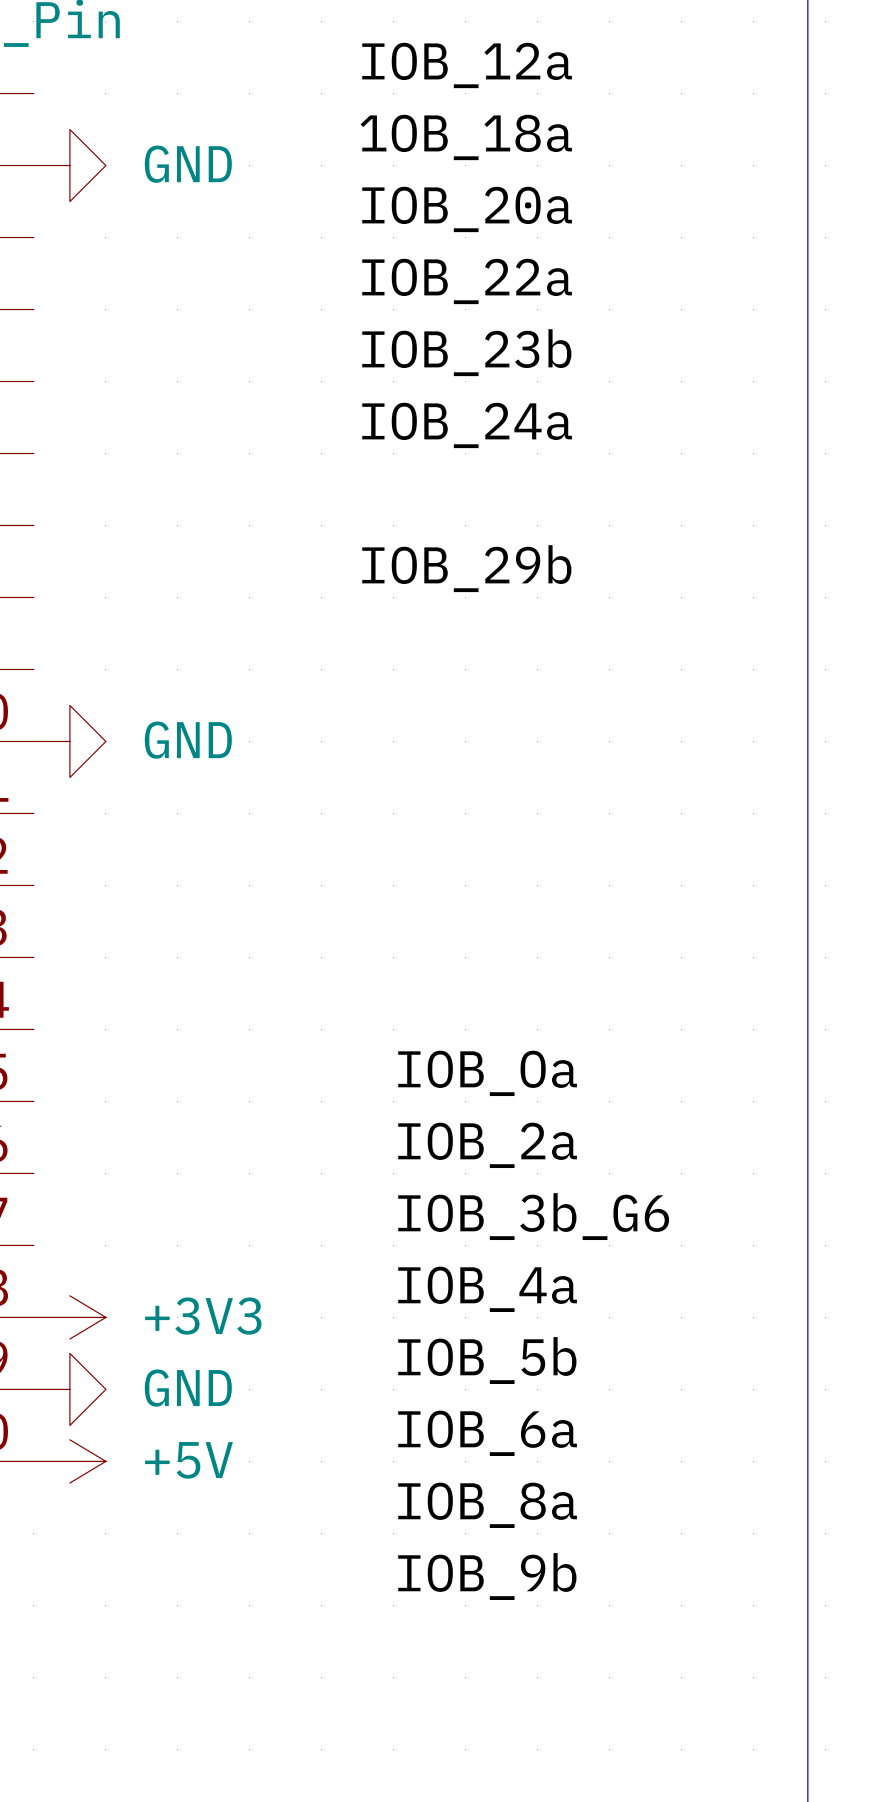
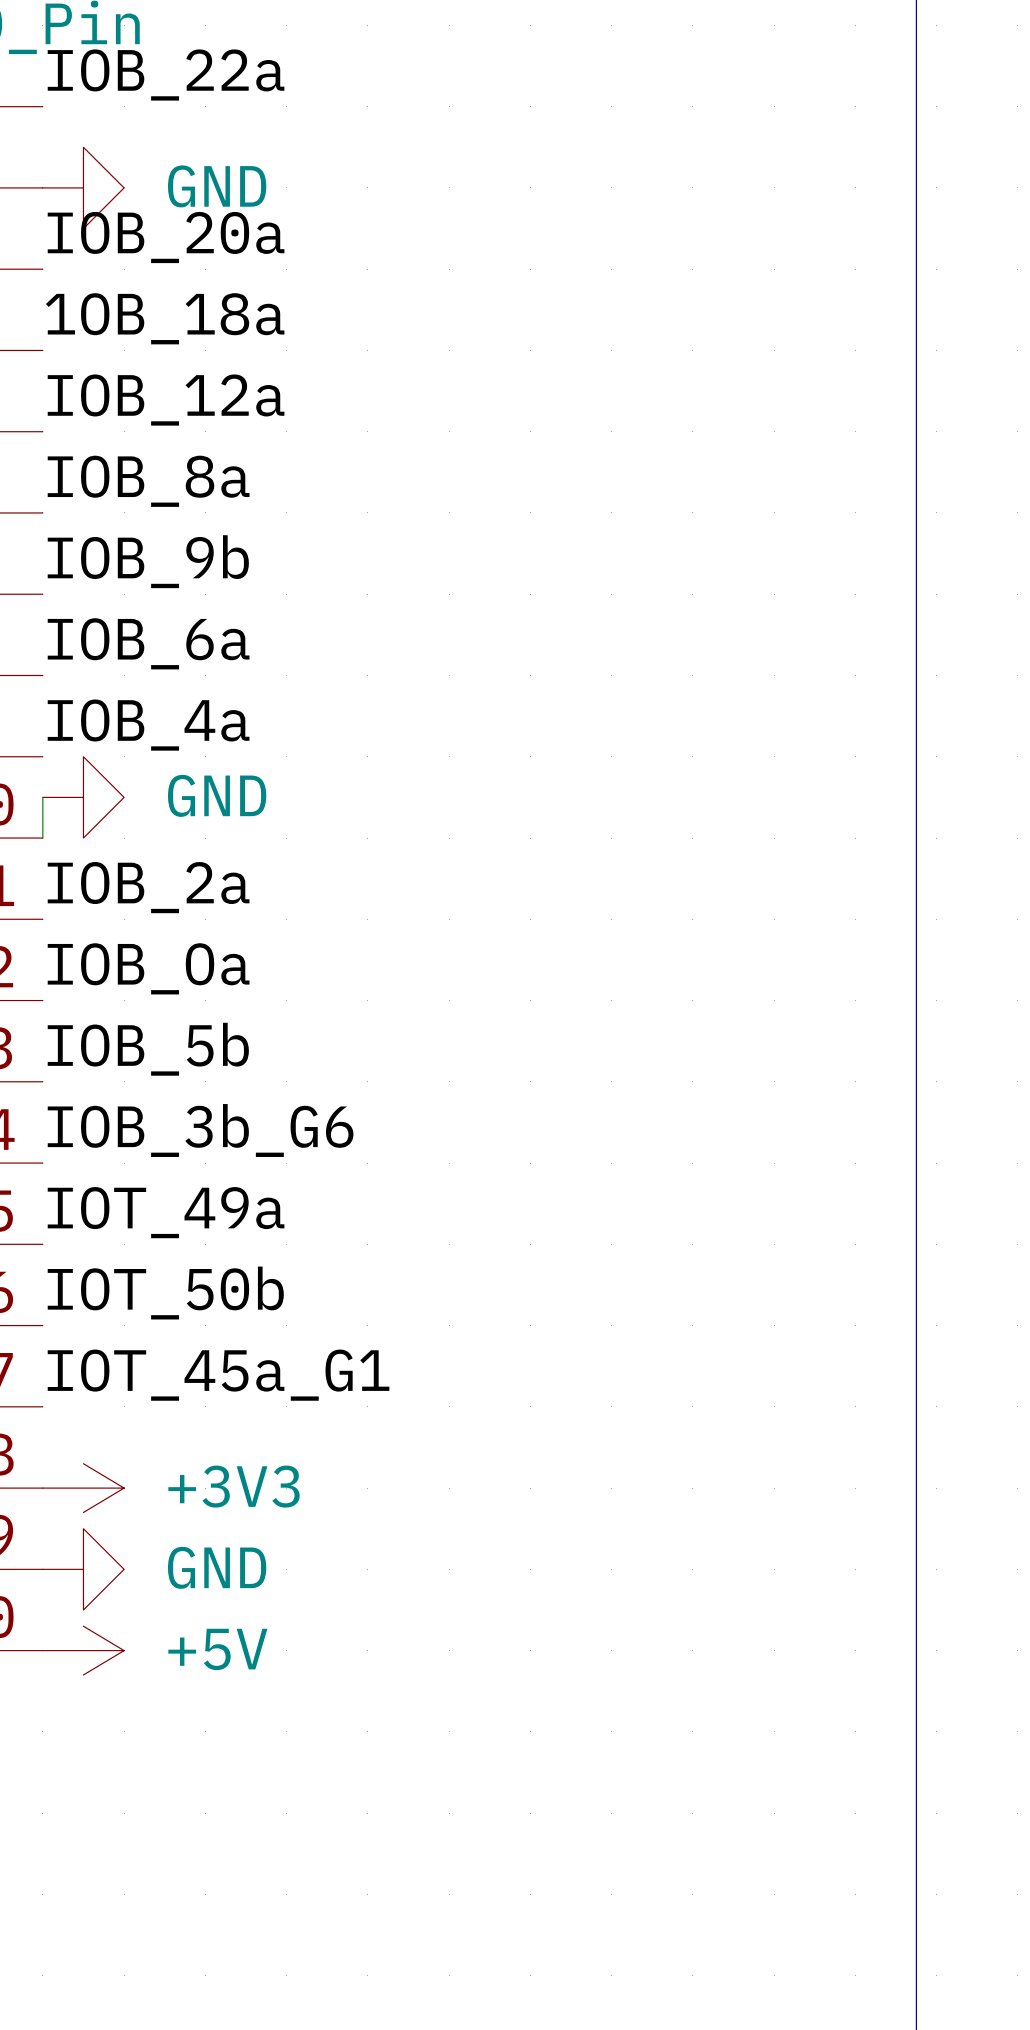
label position: IOB_12a (467, 65) -> IOB_12a (166, 400)
label position: 1OB_18a (466, 137) -> 1OB_18a (165, 318)
label position: IOB_20a (467, 209) -> IOB_20a (166, 237)
label position: IOB_22a (467, 281) -> IOB_22a (166, 74)
label: IOB_23b (466, 352) -> none
label: none -> IOB_8a (148, 481)
label: IOB_24a (467, 425) -> none
label: none -> IOB_9b (148, 561)
label: IOB_29b (466, 568) -> none
label: none -> IOB_6a (148, 643)
label: none -> IOB_4a (148, 725)
wire: none -> (42, 797) (42, 838)
power symbol position: GND (69, 741) -> GND (83, 797)
label: none -> IOT_49a (166, 1212)
label position: IOB_Oa (487, 1073) -> IOB_Oa (148, 968)
label: none -> IOT_50b (165, 1293)
label position: IOB_2a (487, 1145) -> IOB_2a (148, 887)
label position: IOB_3b_G6 (533, 1216) -> IOB_3b_G6 (200, 1130)
label: IOB_4a (487, 1289) -> IOT_45a_G1 (218, 1375)
label position: IOB_5b (487, 1360) -> IOB_5b (148, 1049)
label: IOB_6a (487, 1433) -> none
label: IOB_8a (487, 1505) -> none
label: IOB_9b (487, 1576) -> none

